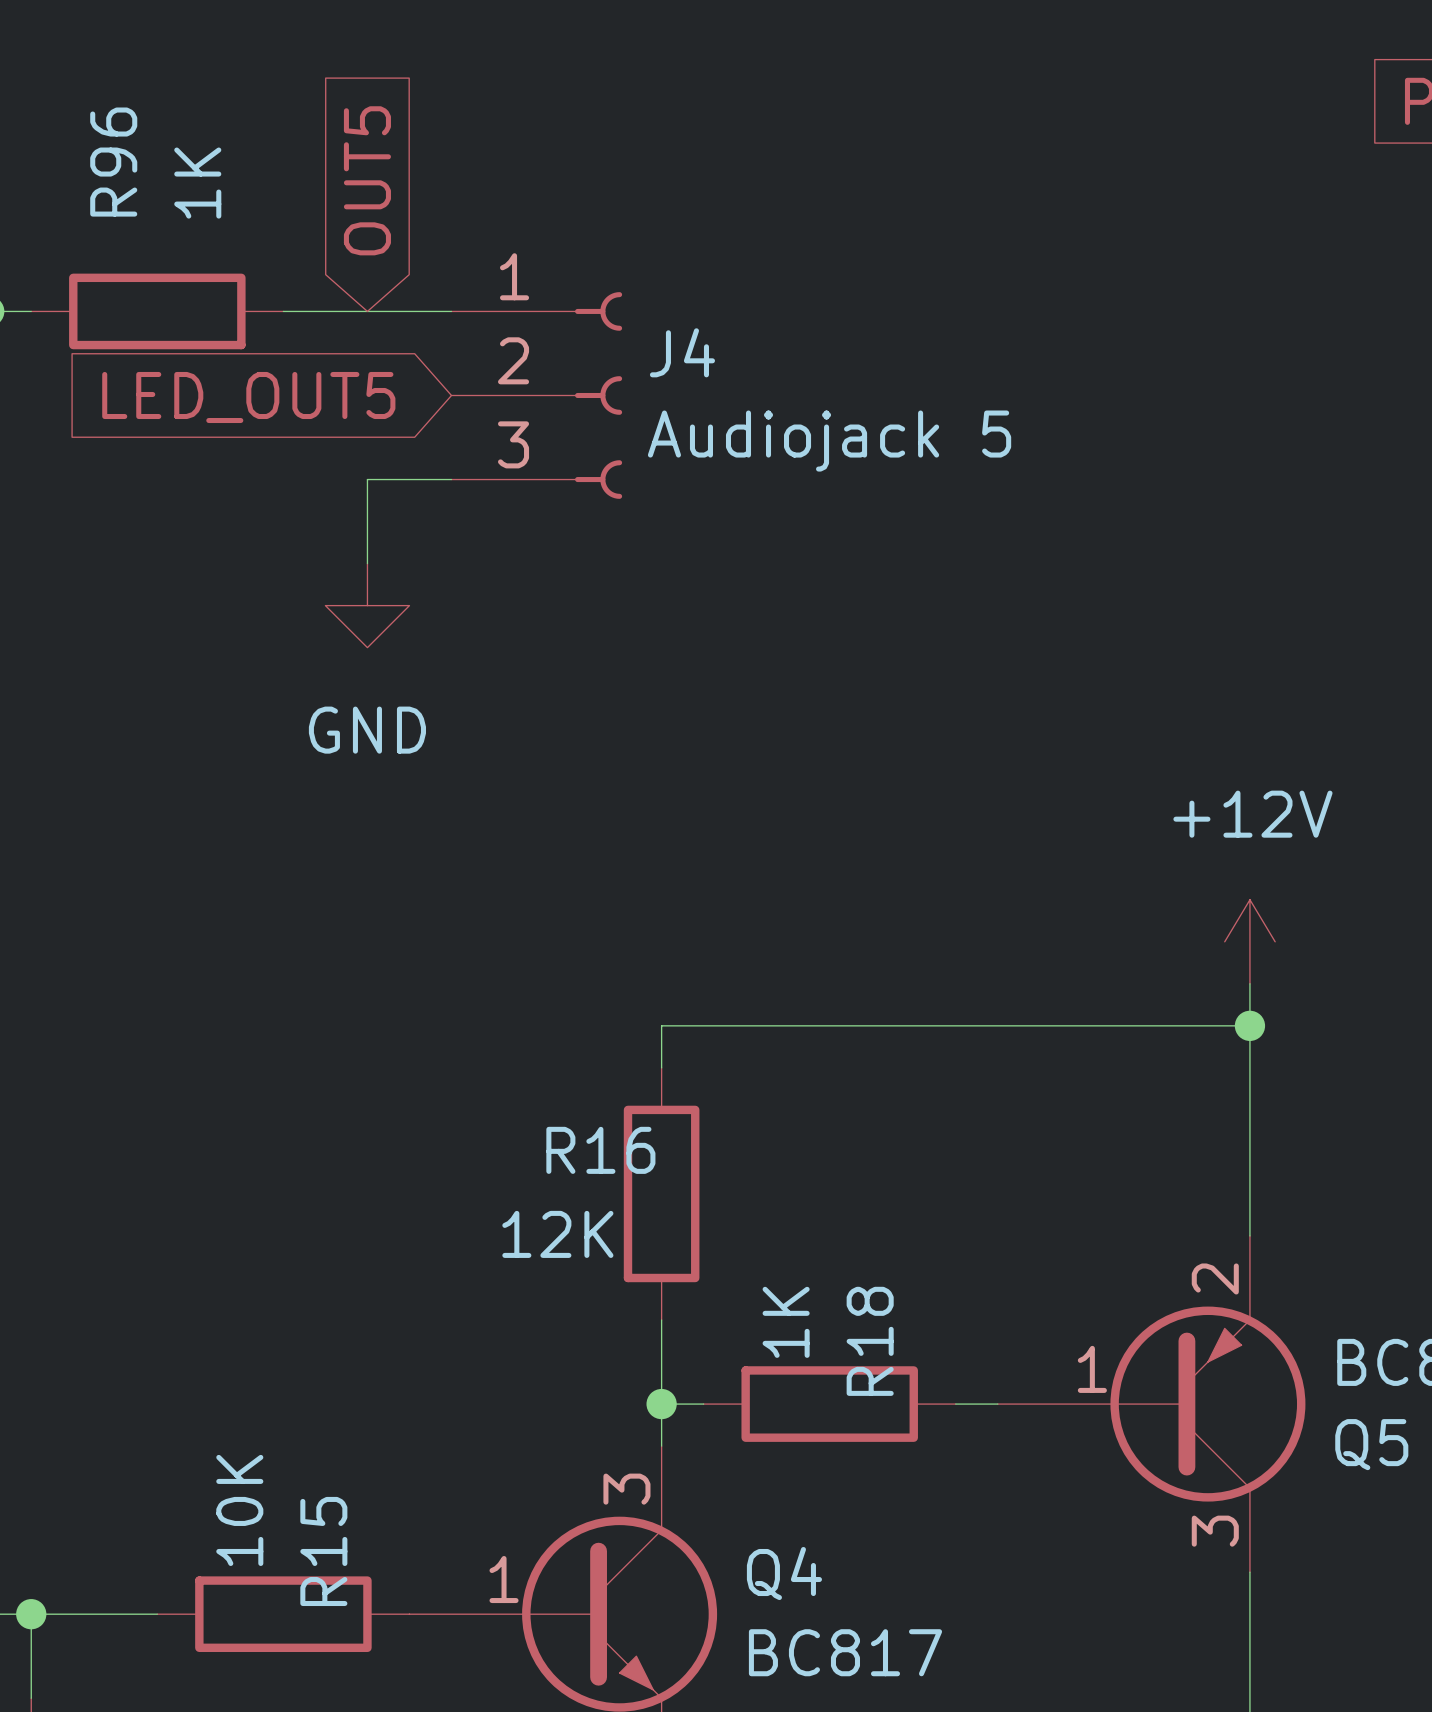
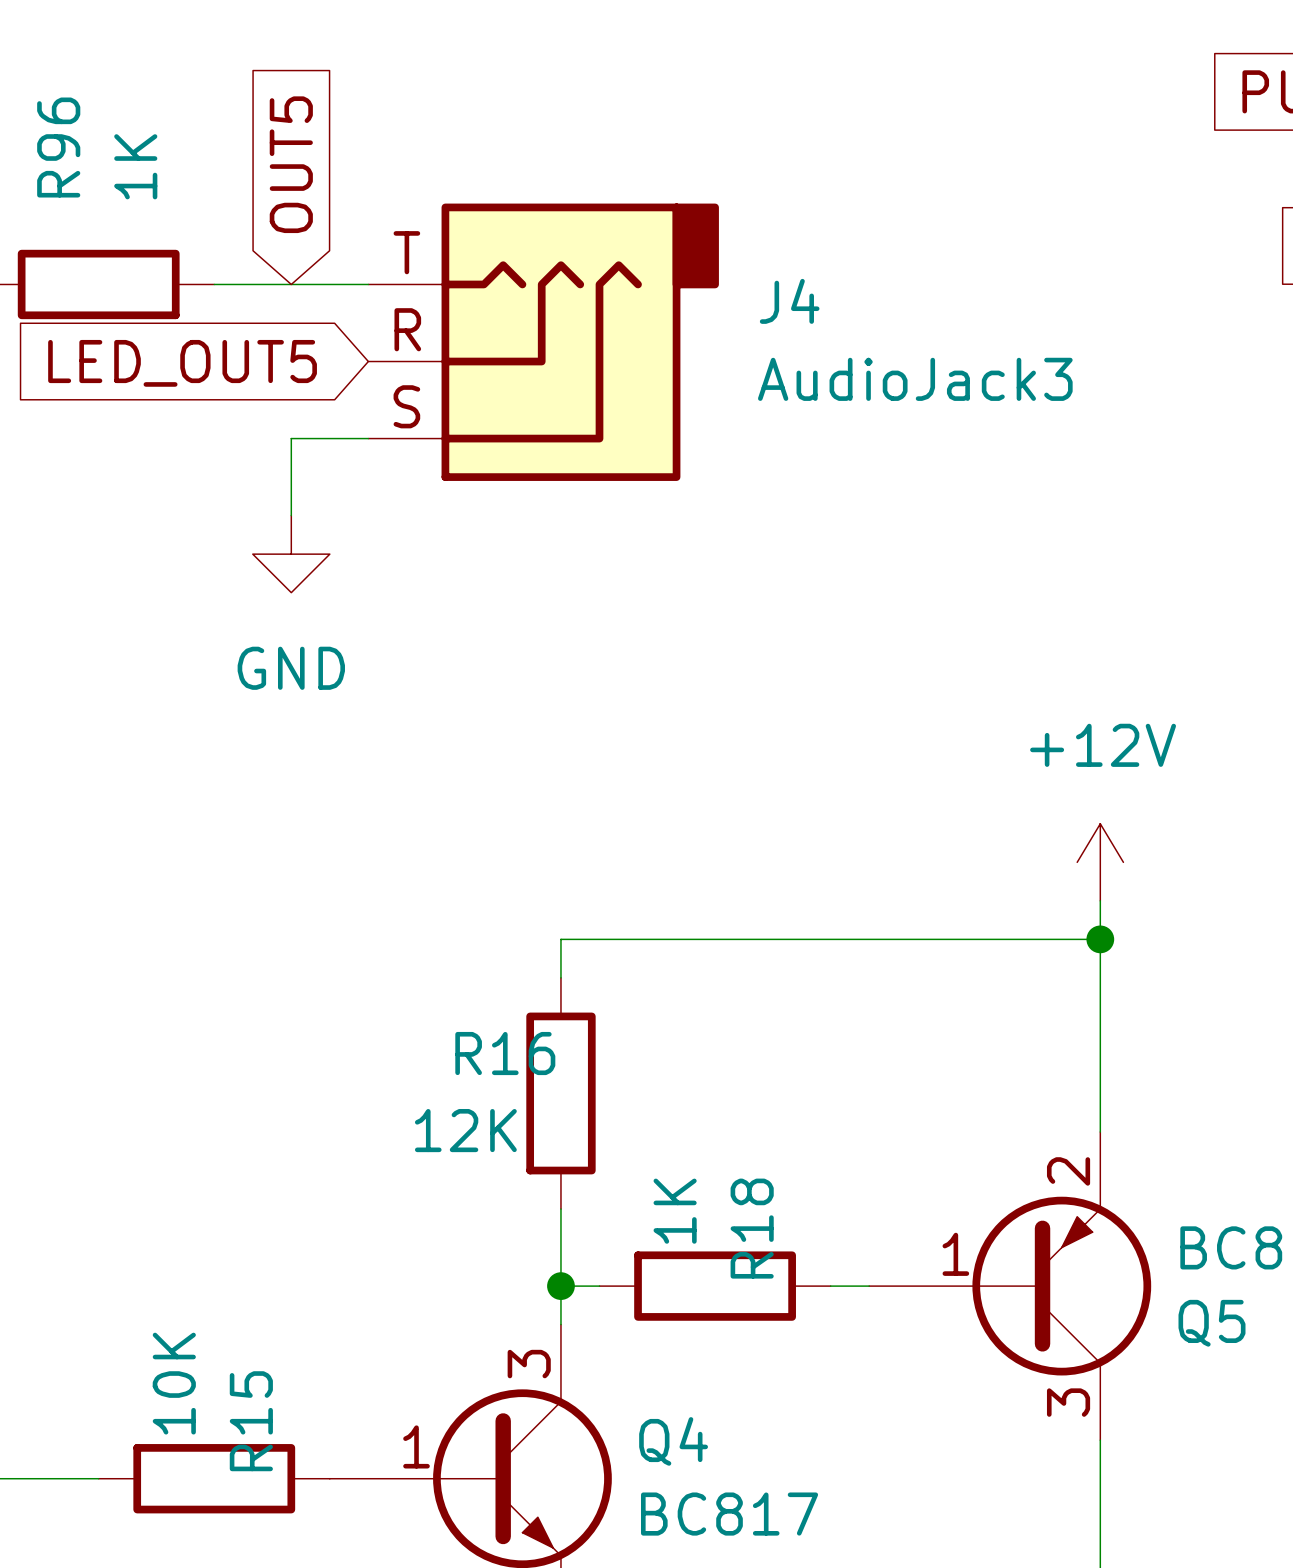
J4 symbol: [451, 292, 623, 499] -> [368, 203, 719, 481]
J4 name position: J4 (682, 352) -> J4 (789, 301)
J4 value: Audiojack 5 (829, 441) -> AudioJack3 (915, 379)

